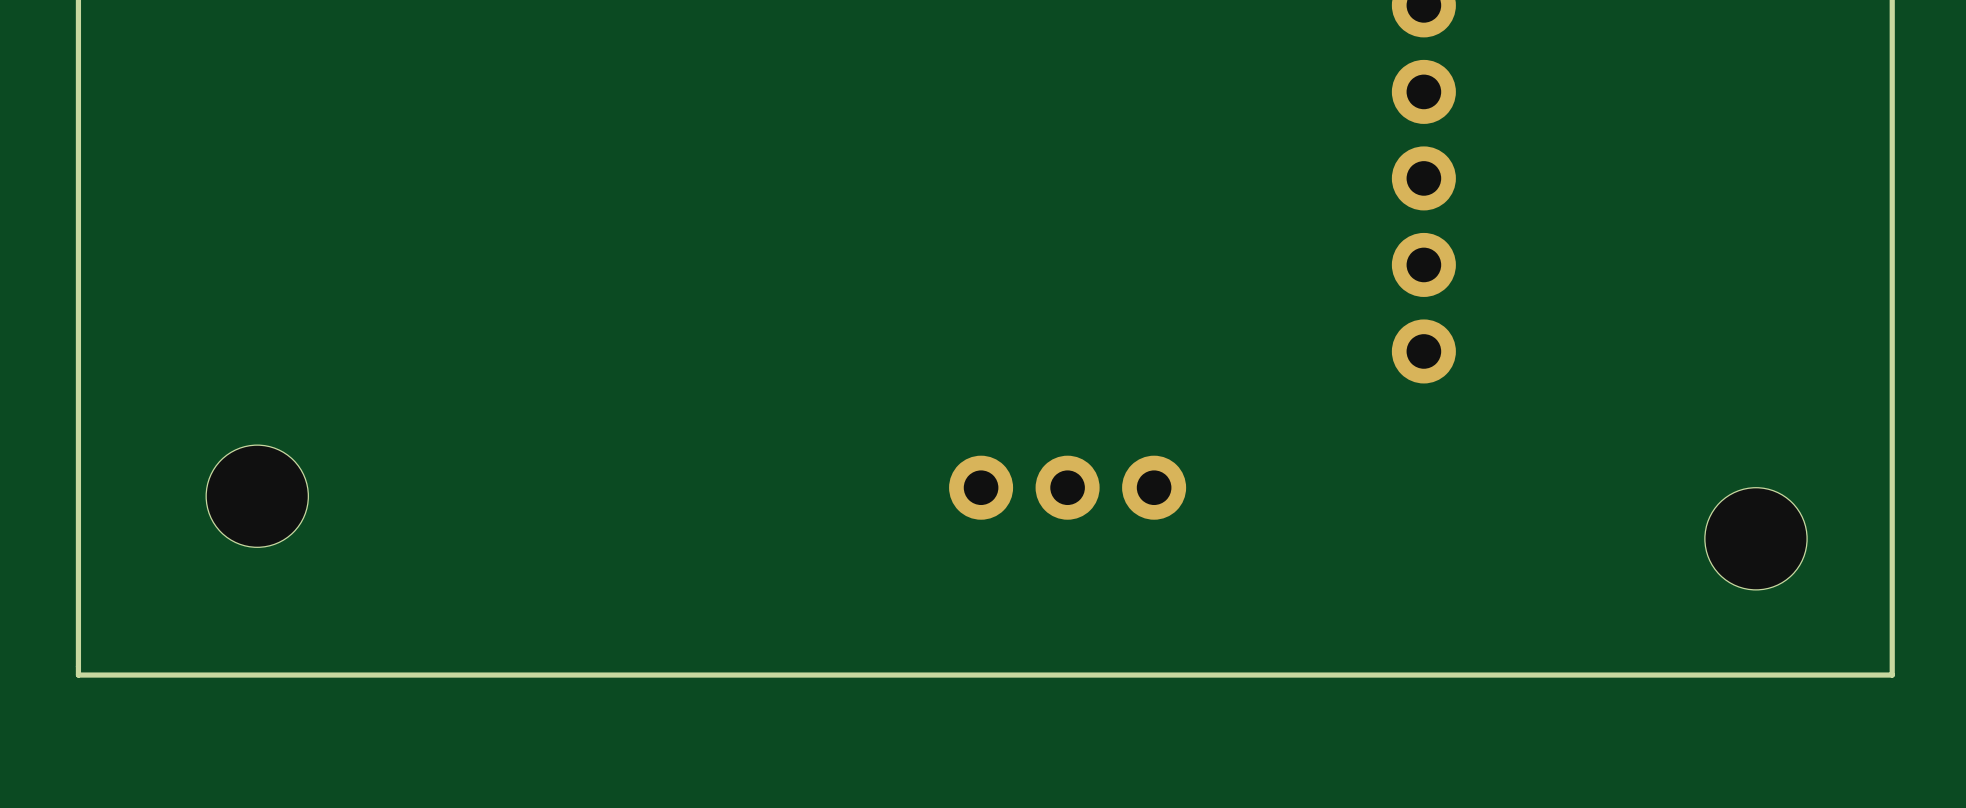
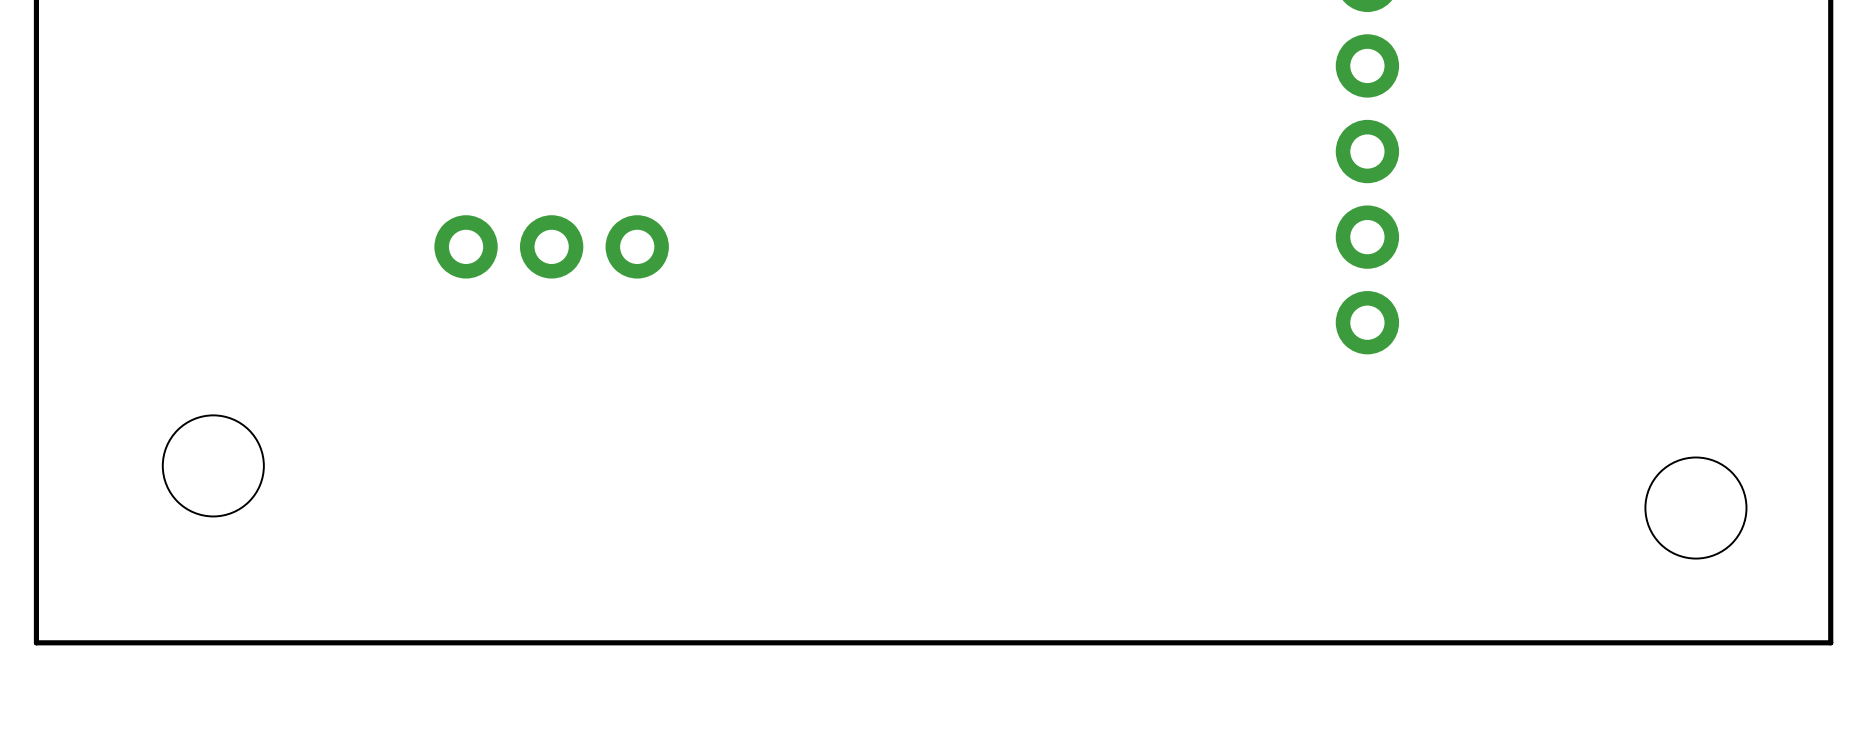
part position: (1067, 487) -> (551, 246)

